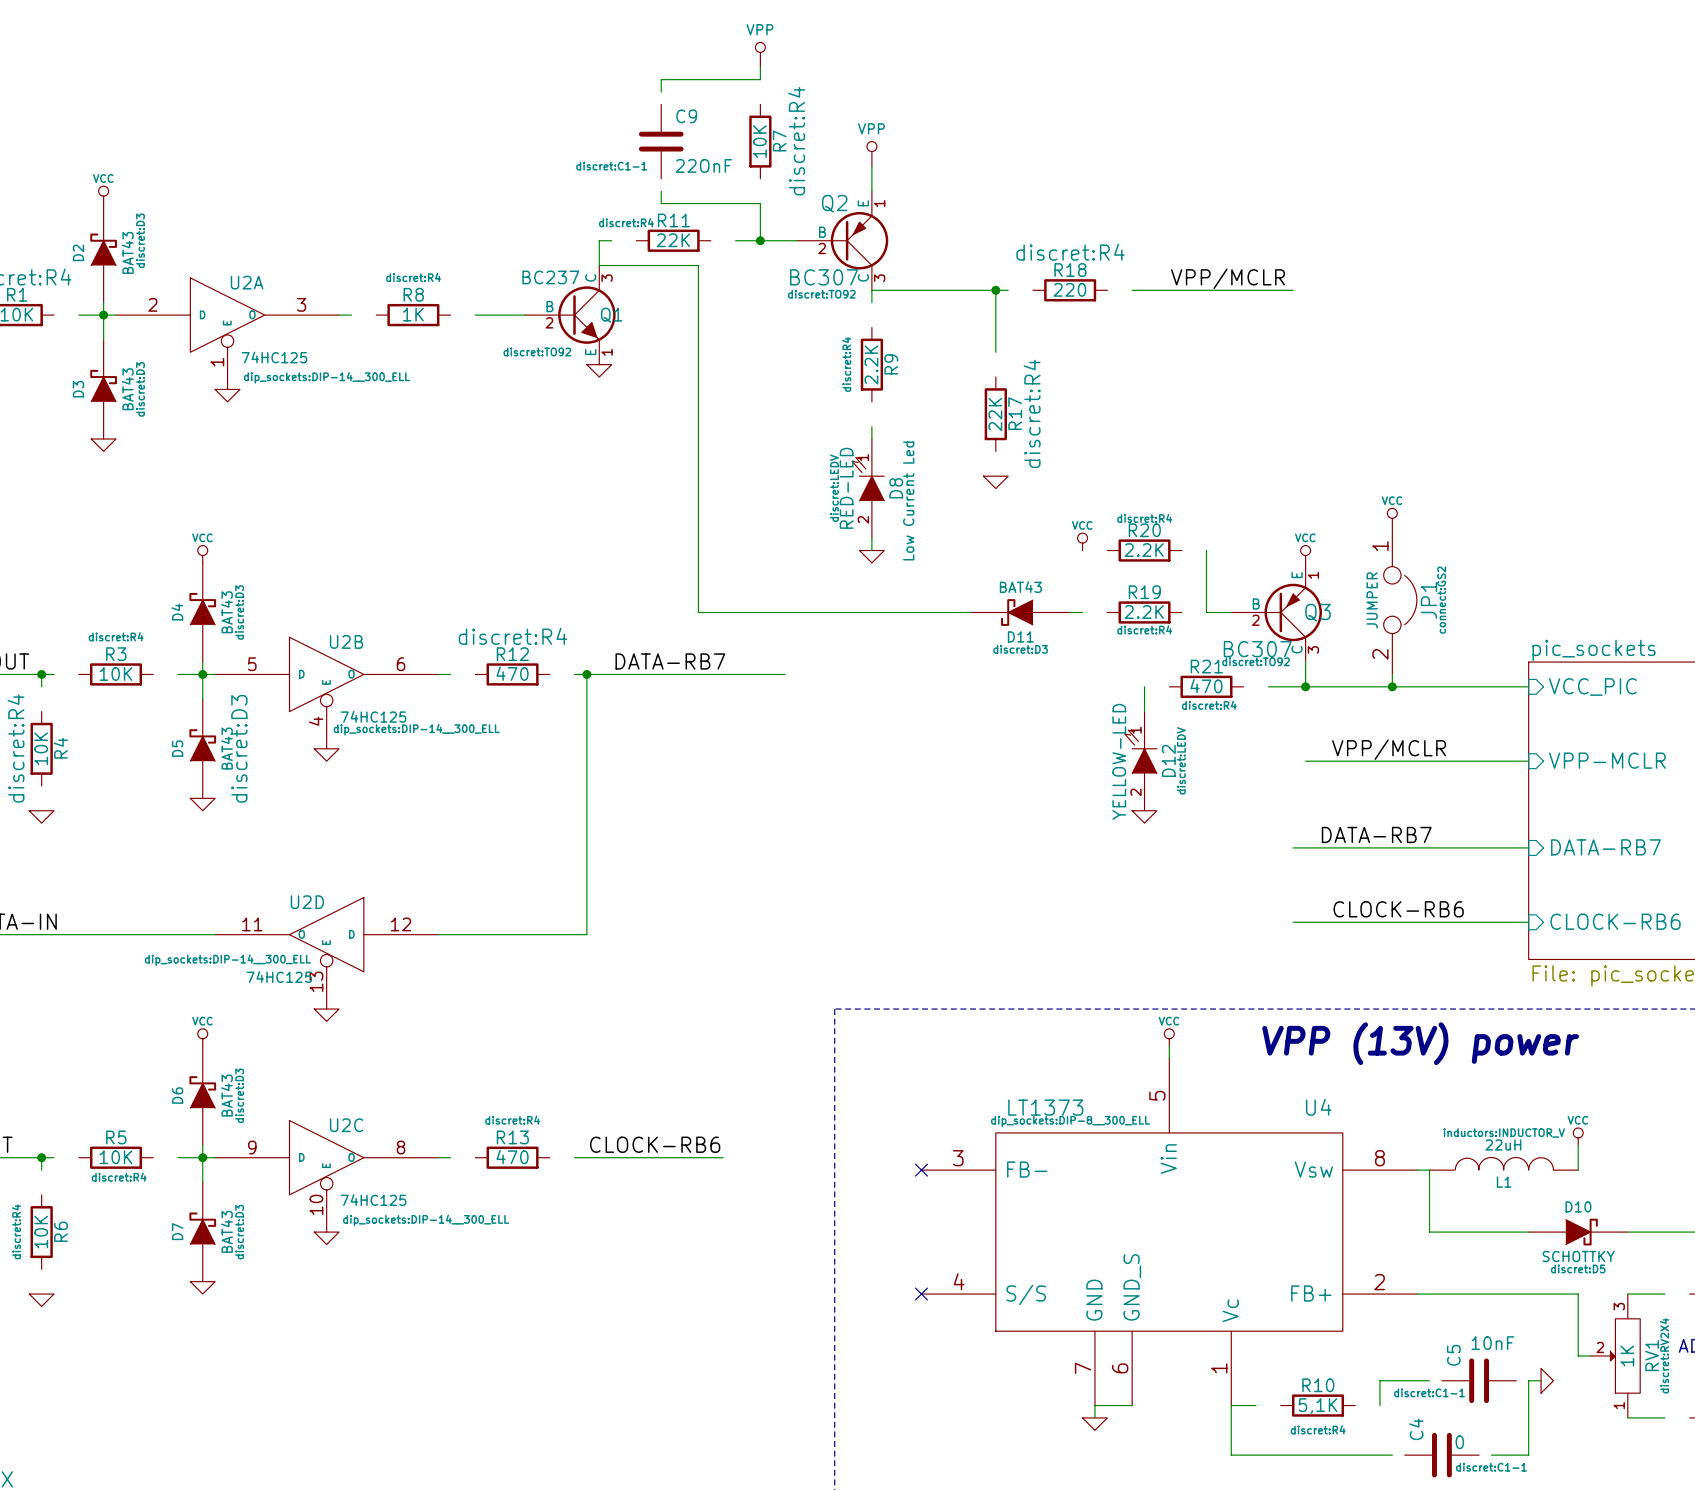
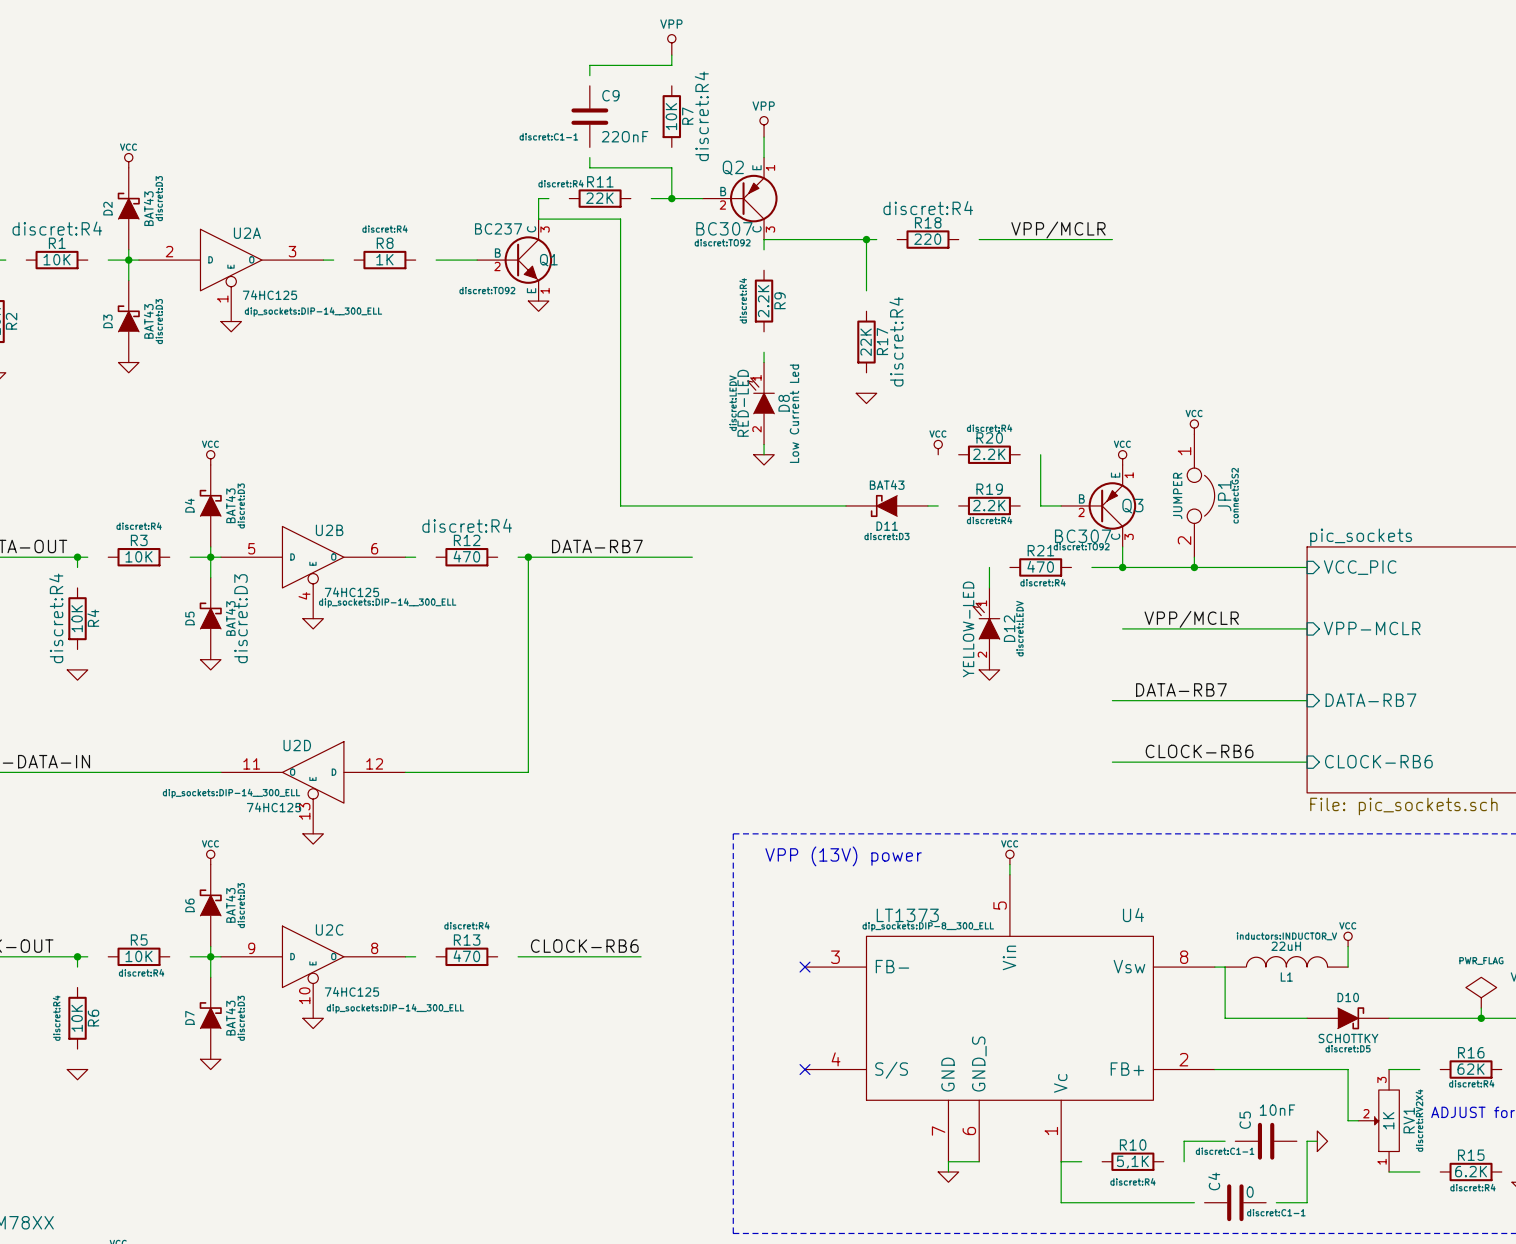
text: none -> VPP (13V) power (843, 856)
text: VPP (13V) power (1420, 1043) -> none

